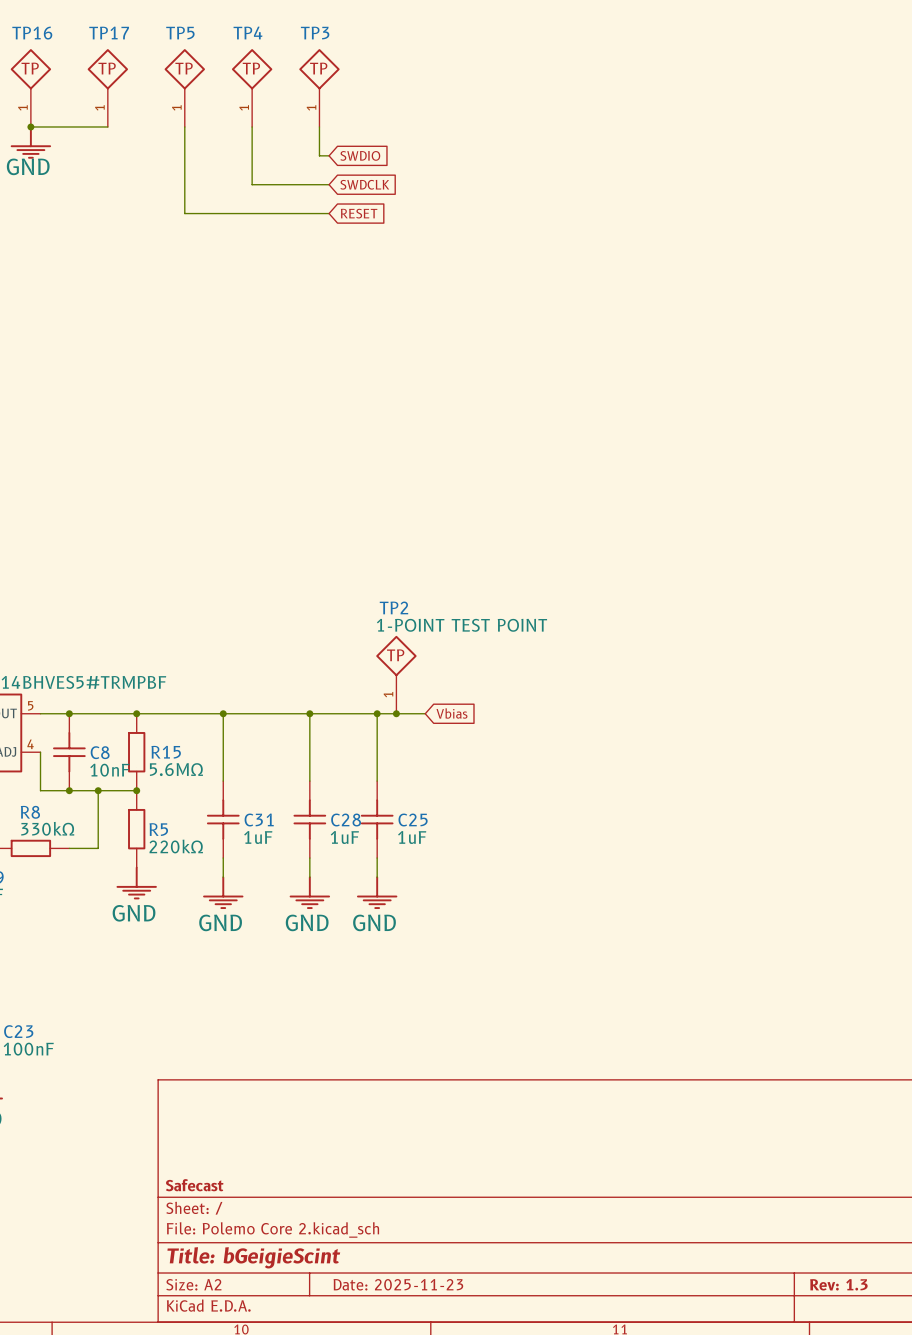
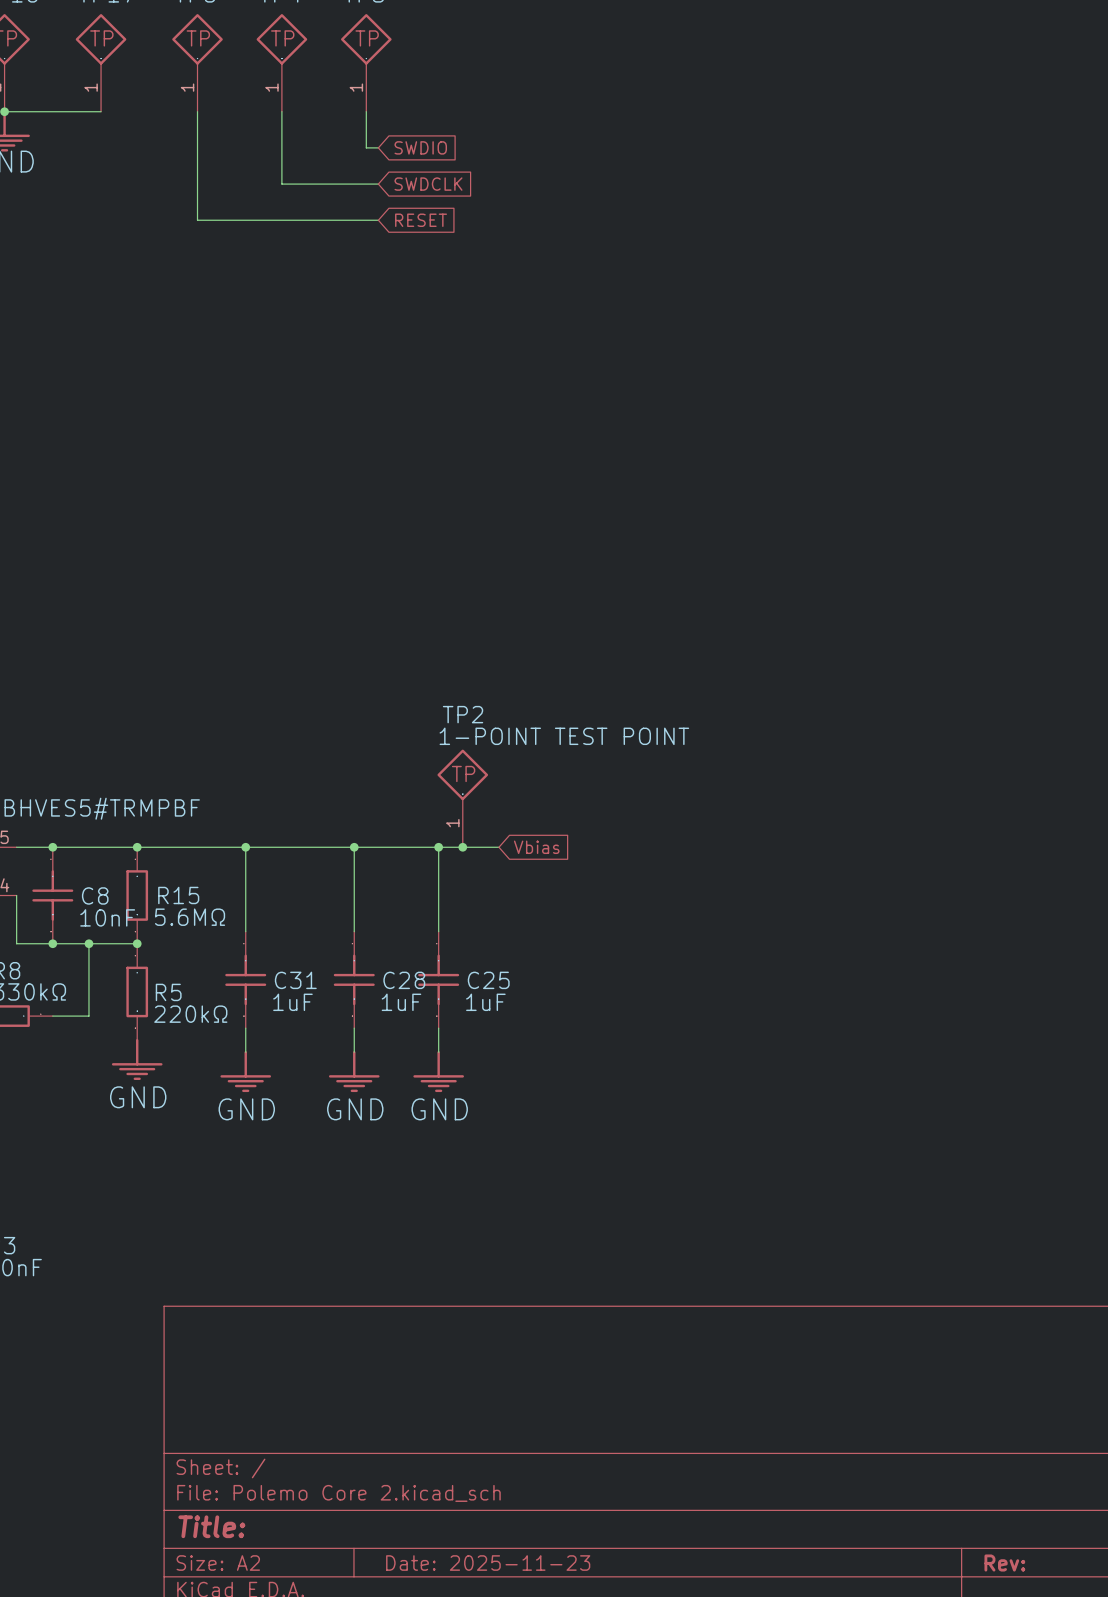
title block: Safecast (194, 1185) -> none
title block: Title: bGeigieScint (253, 1257) -> Title: (211, 1526)
title block: Rev: 1.3 (838, 1284) -> Rev: (1004, 1563)

